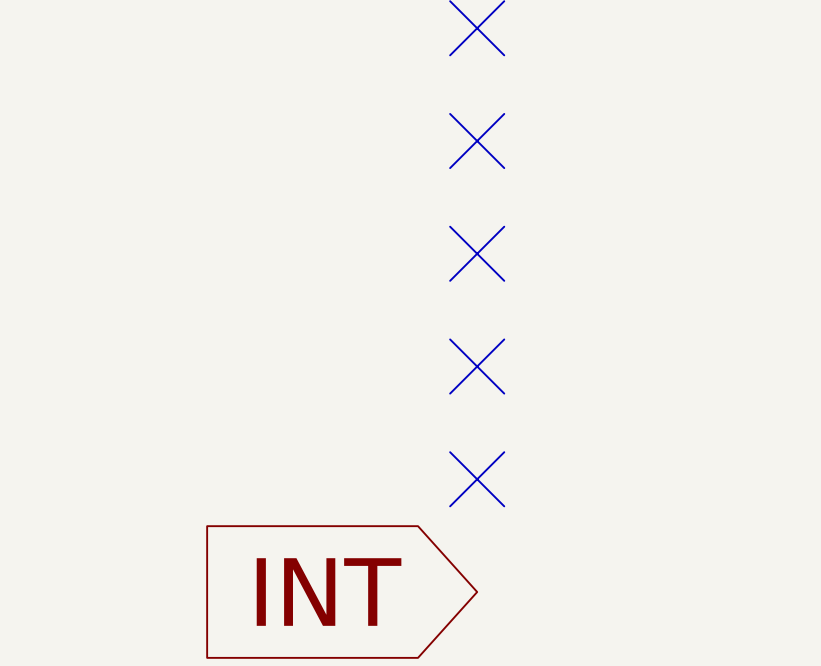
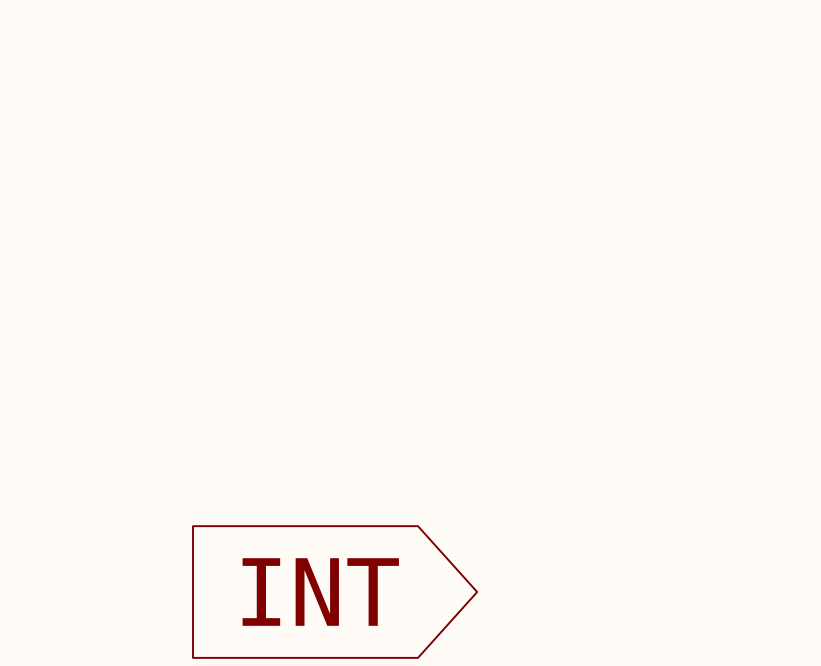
no-connect mark: (477, 28) -> none
no-connect mark: (477, 141) -> none
no-connect mark: (477, 253) -> none
no-connect mark: (477, 366) -> none
no-connect mark: (477, 479) -> none

